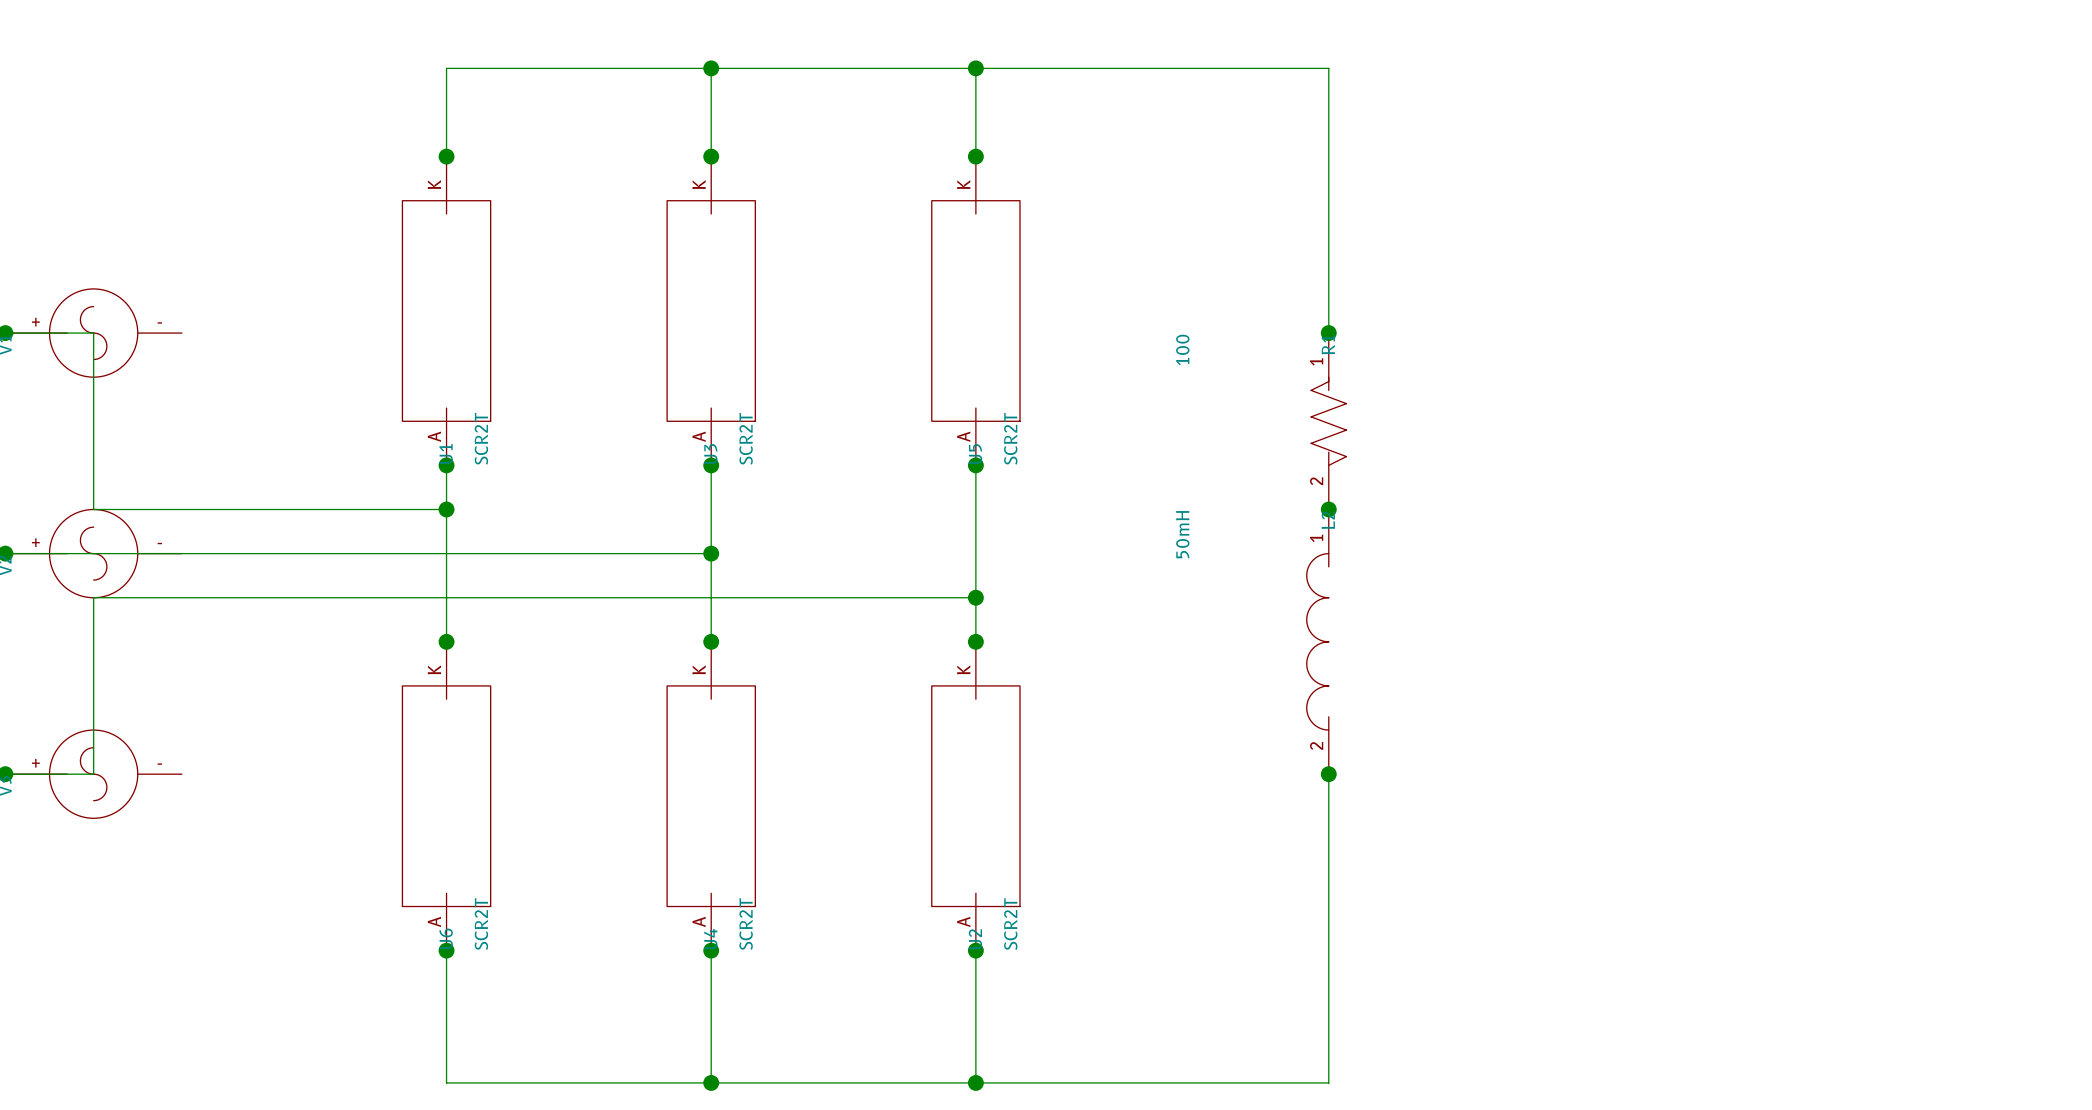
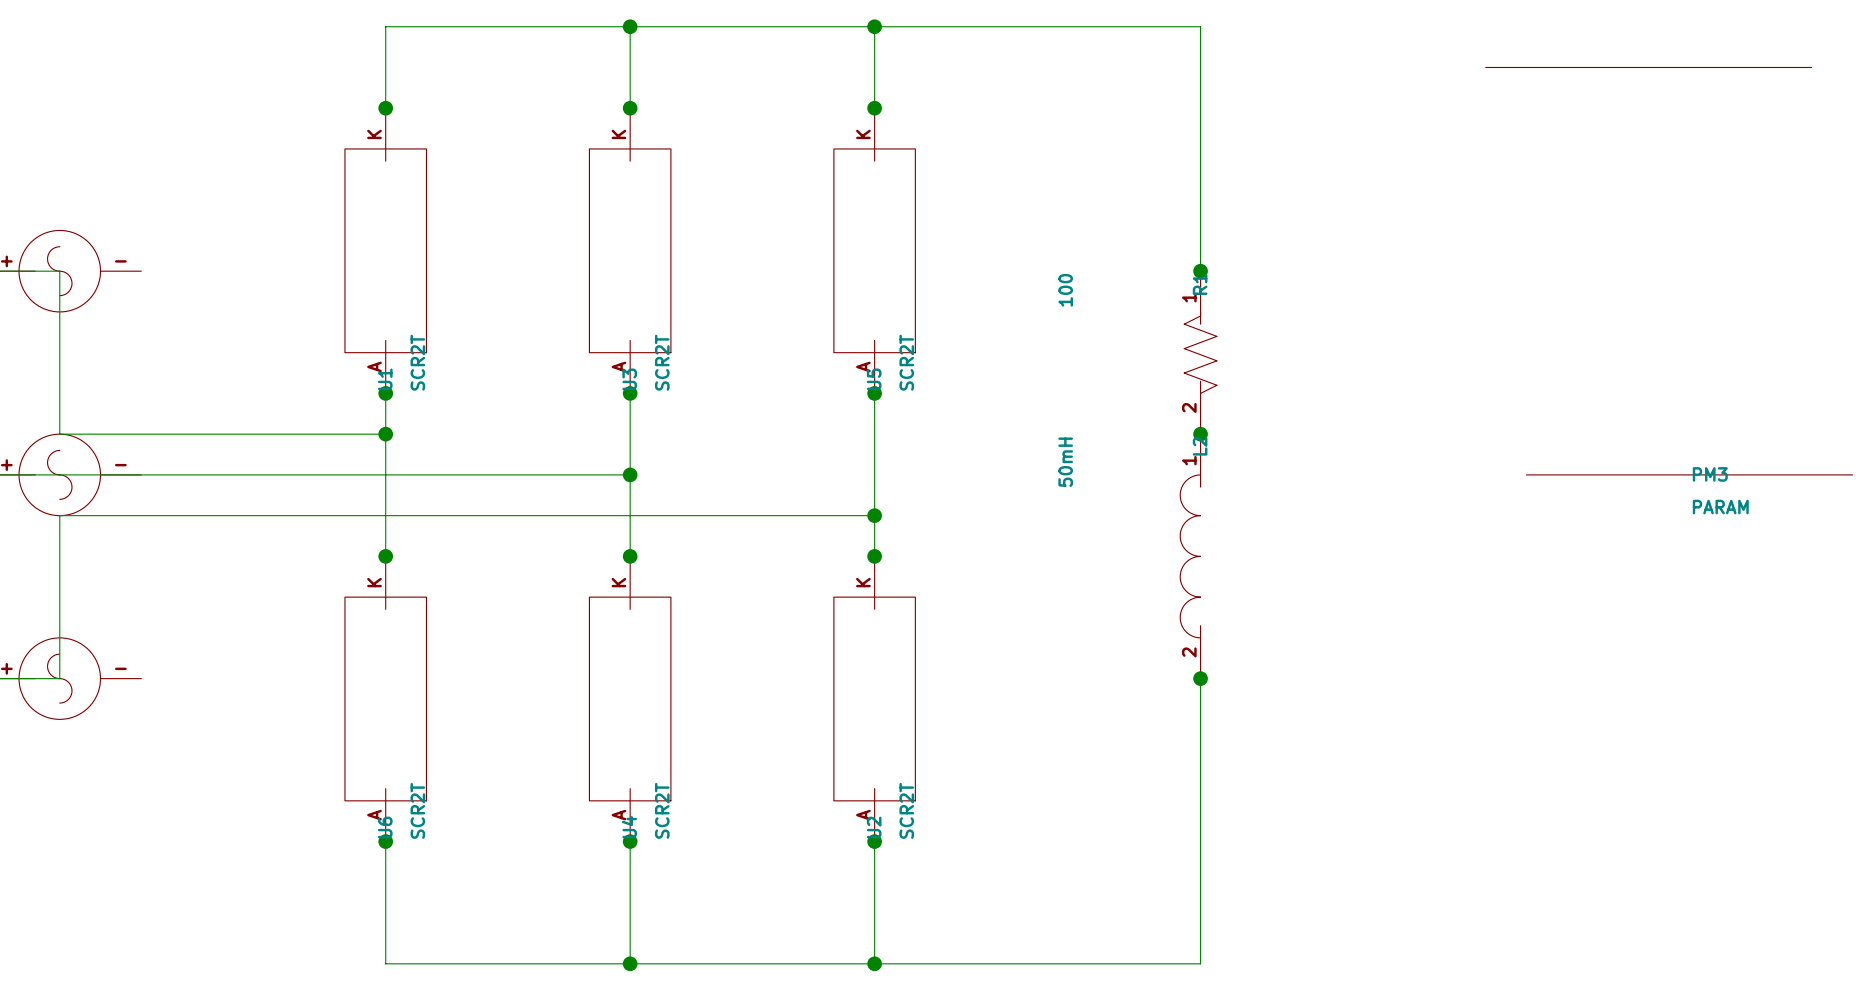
part: none -> (1648, 67)
PM3: none -> PARAM (1689, 474)

